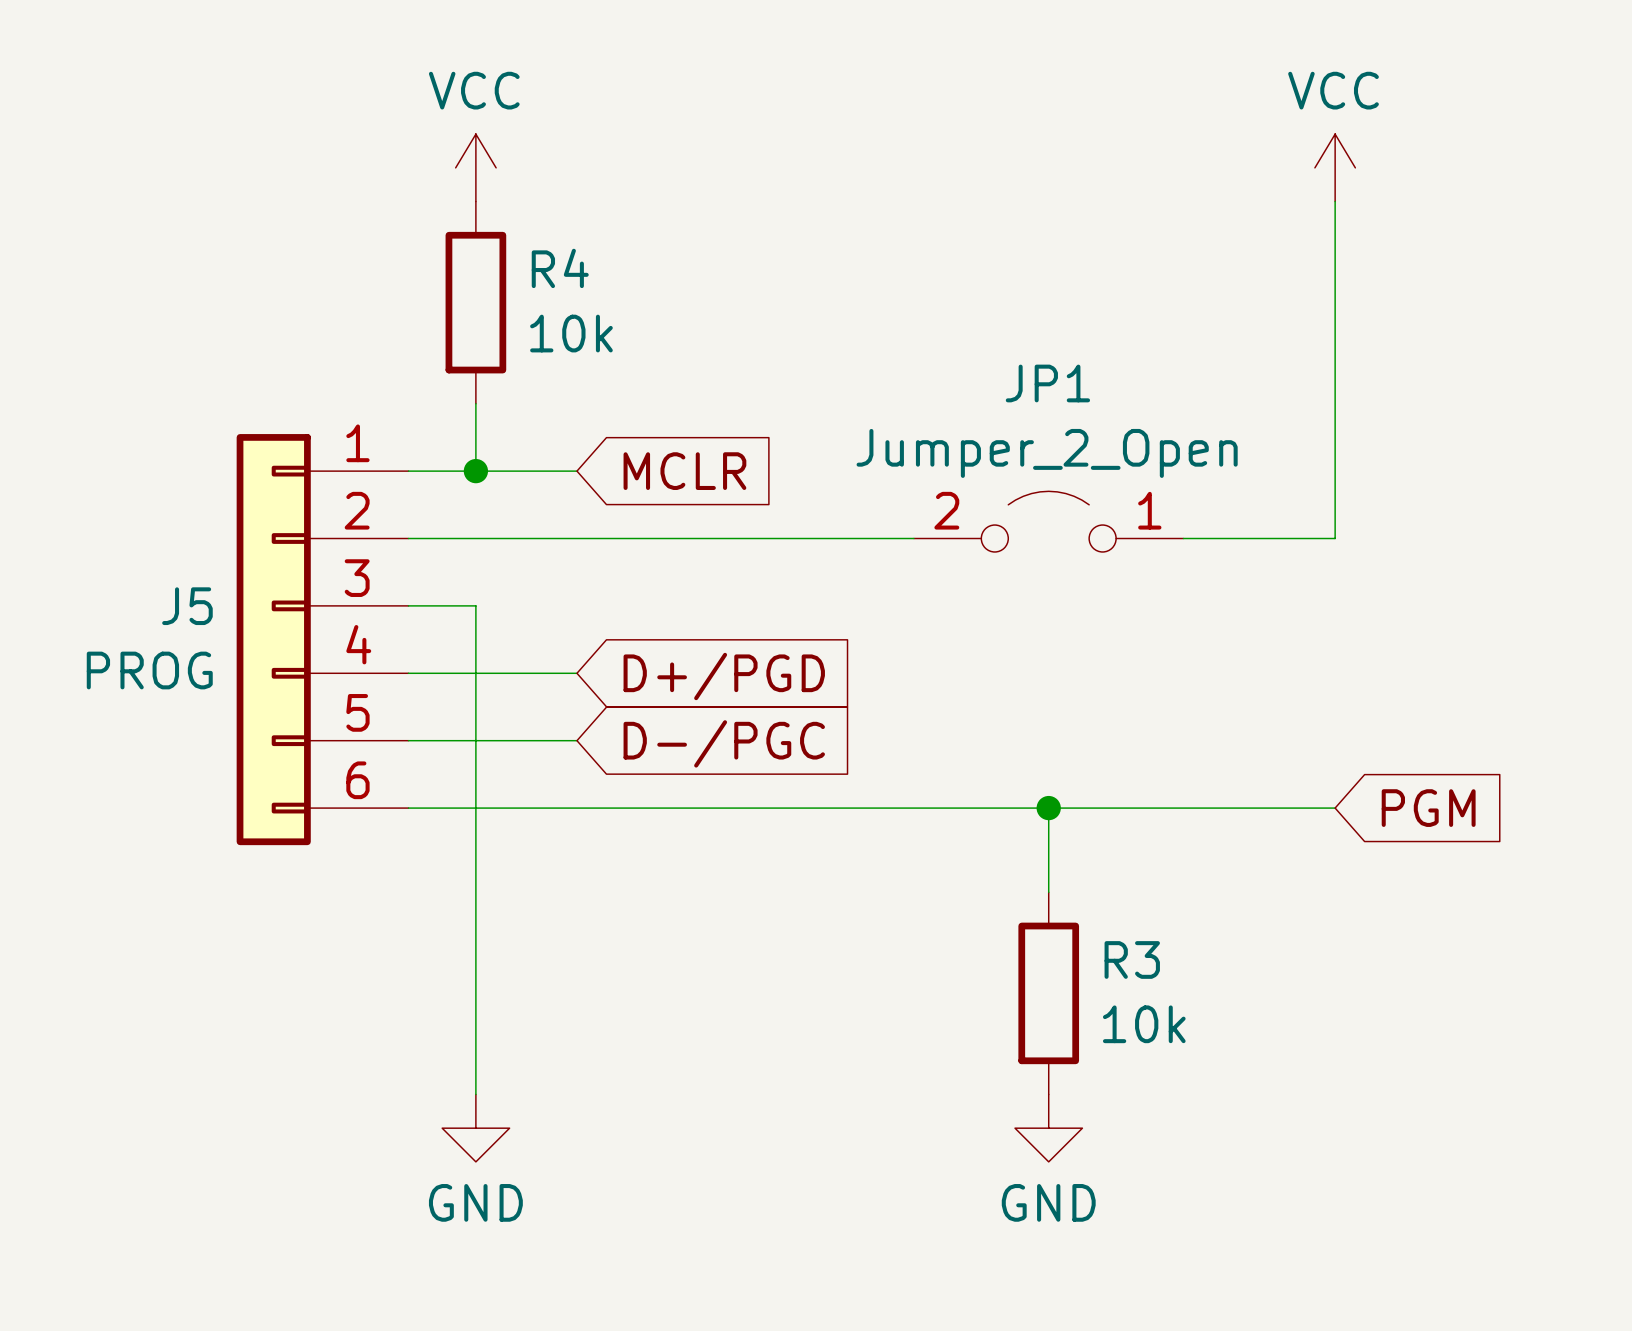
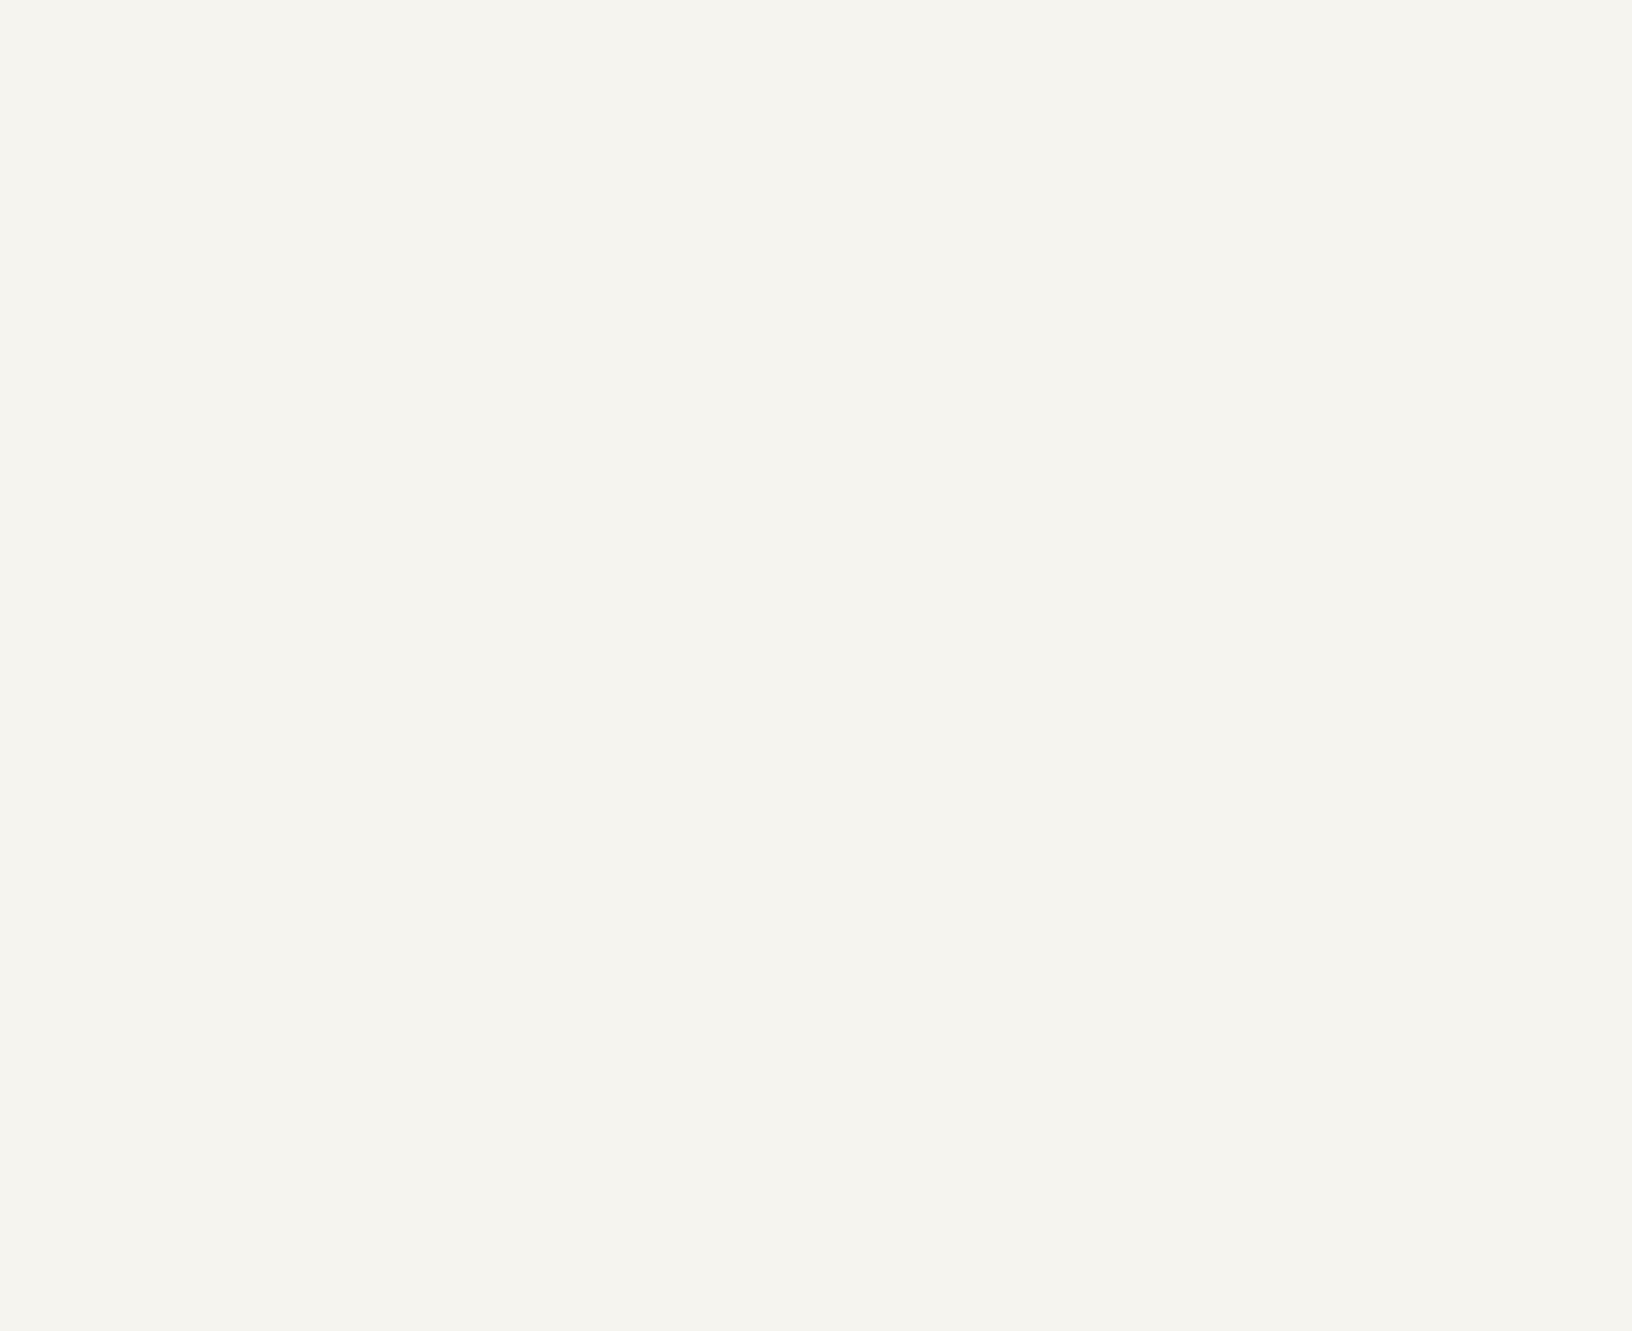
power symbol: VCC (475, 167) -> none
power symbol: VCC (1335, 167) -> none
wire: (1335, 201) (1335, 538) (1183, 538) -> none
R4: 10k (475, 302) -> none
wire: (475, 403) (475, 471) -> none
wire: (408, 471) (576, 471) -> none
junction: (475, 471) -> none
global label: MCLR (684, 471) -> none
JP1: Jumper_2_Open (1048, 521) -> none
wire: (408, 538) (913, 538) -> none
wire: (408, 605) (475, 605) (475, 1094) -> none
J5: PROG (322, 639) -> none
wire: (408, 673) (576, 673) -> none
global label: D+/PGD (724, 676) -> none
wire: (408, 740) (576, 740) -> none
global label: D-/PGC (724, 743) -> none
wire: (408, 808) (1335, 808) -> none
wire: (1048, 808) (1048, 892) -> none
junction: (1048, 808) -> none
global label: PGM (1428, 808) -> none
R3: 10k (1048, 993) -> none
power symbol: GND (475, 1128) -> none
power symbol: GND (1048, 1128) -> none

